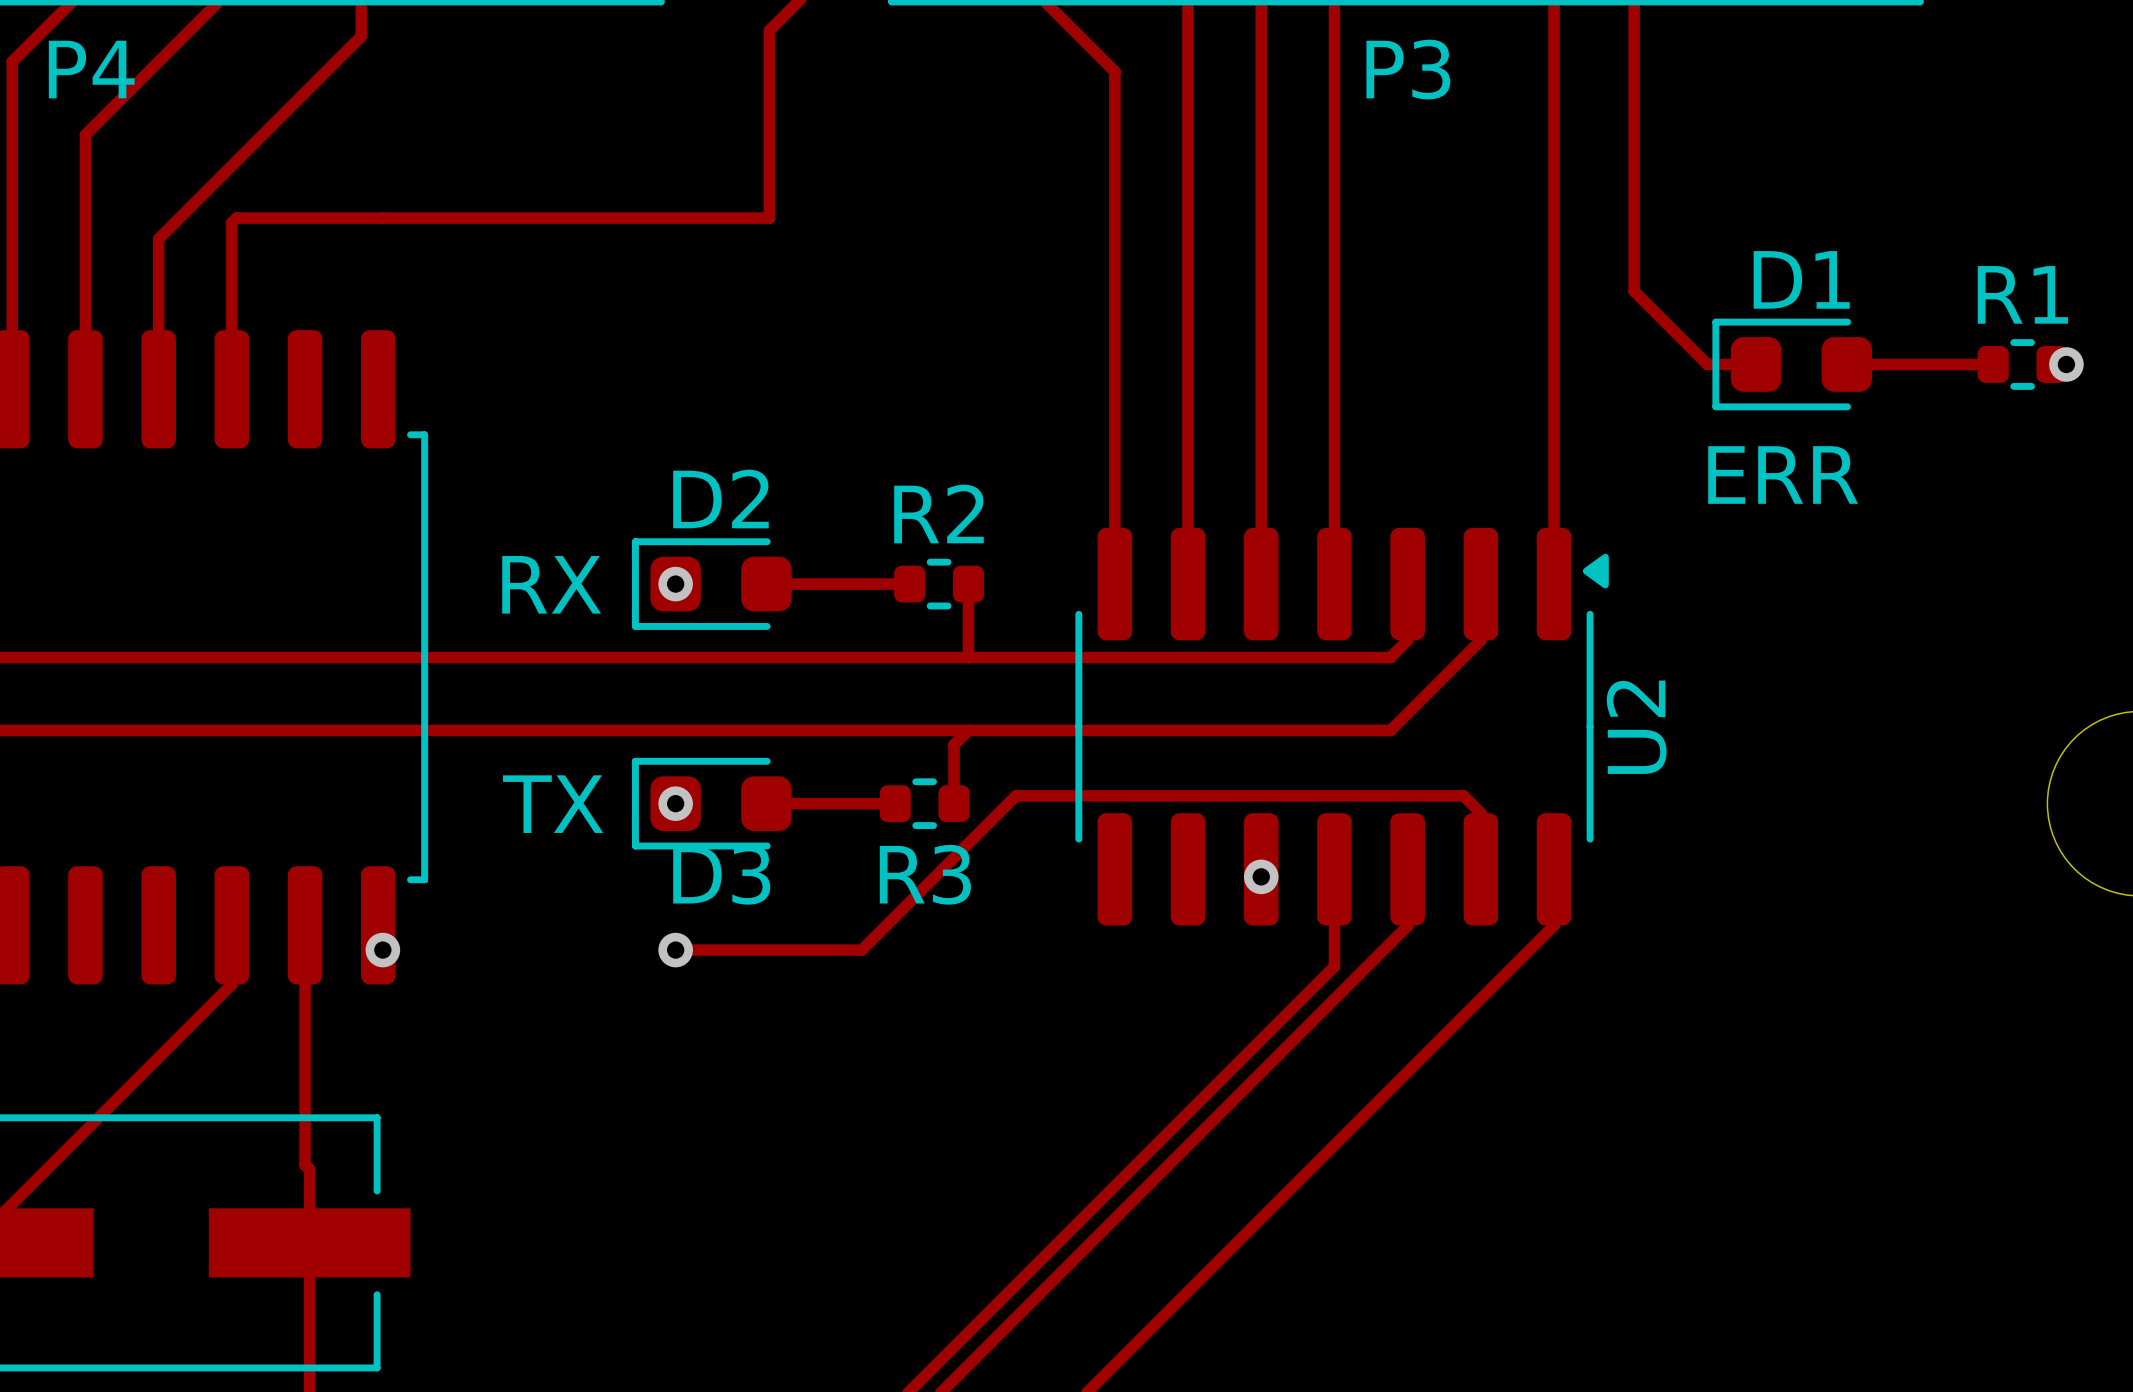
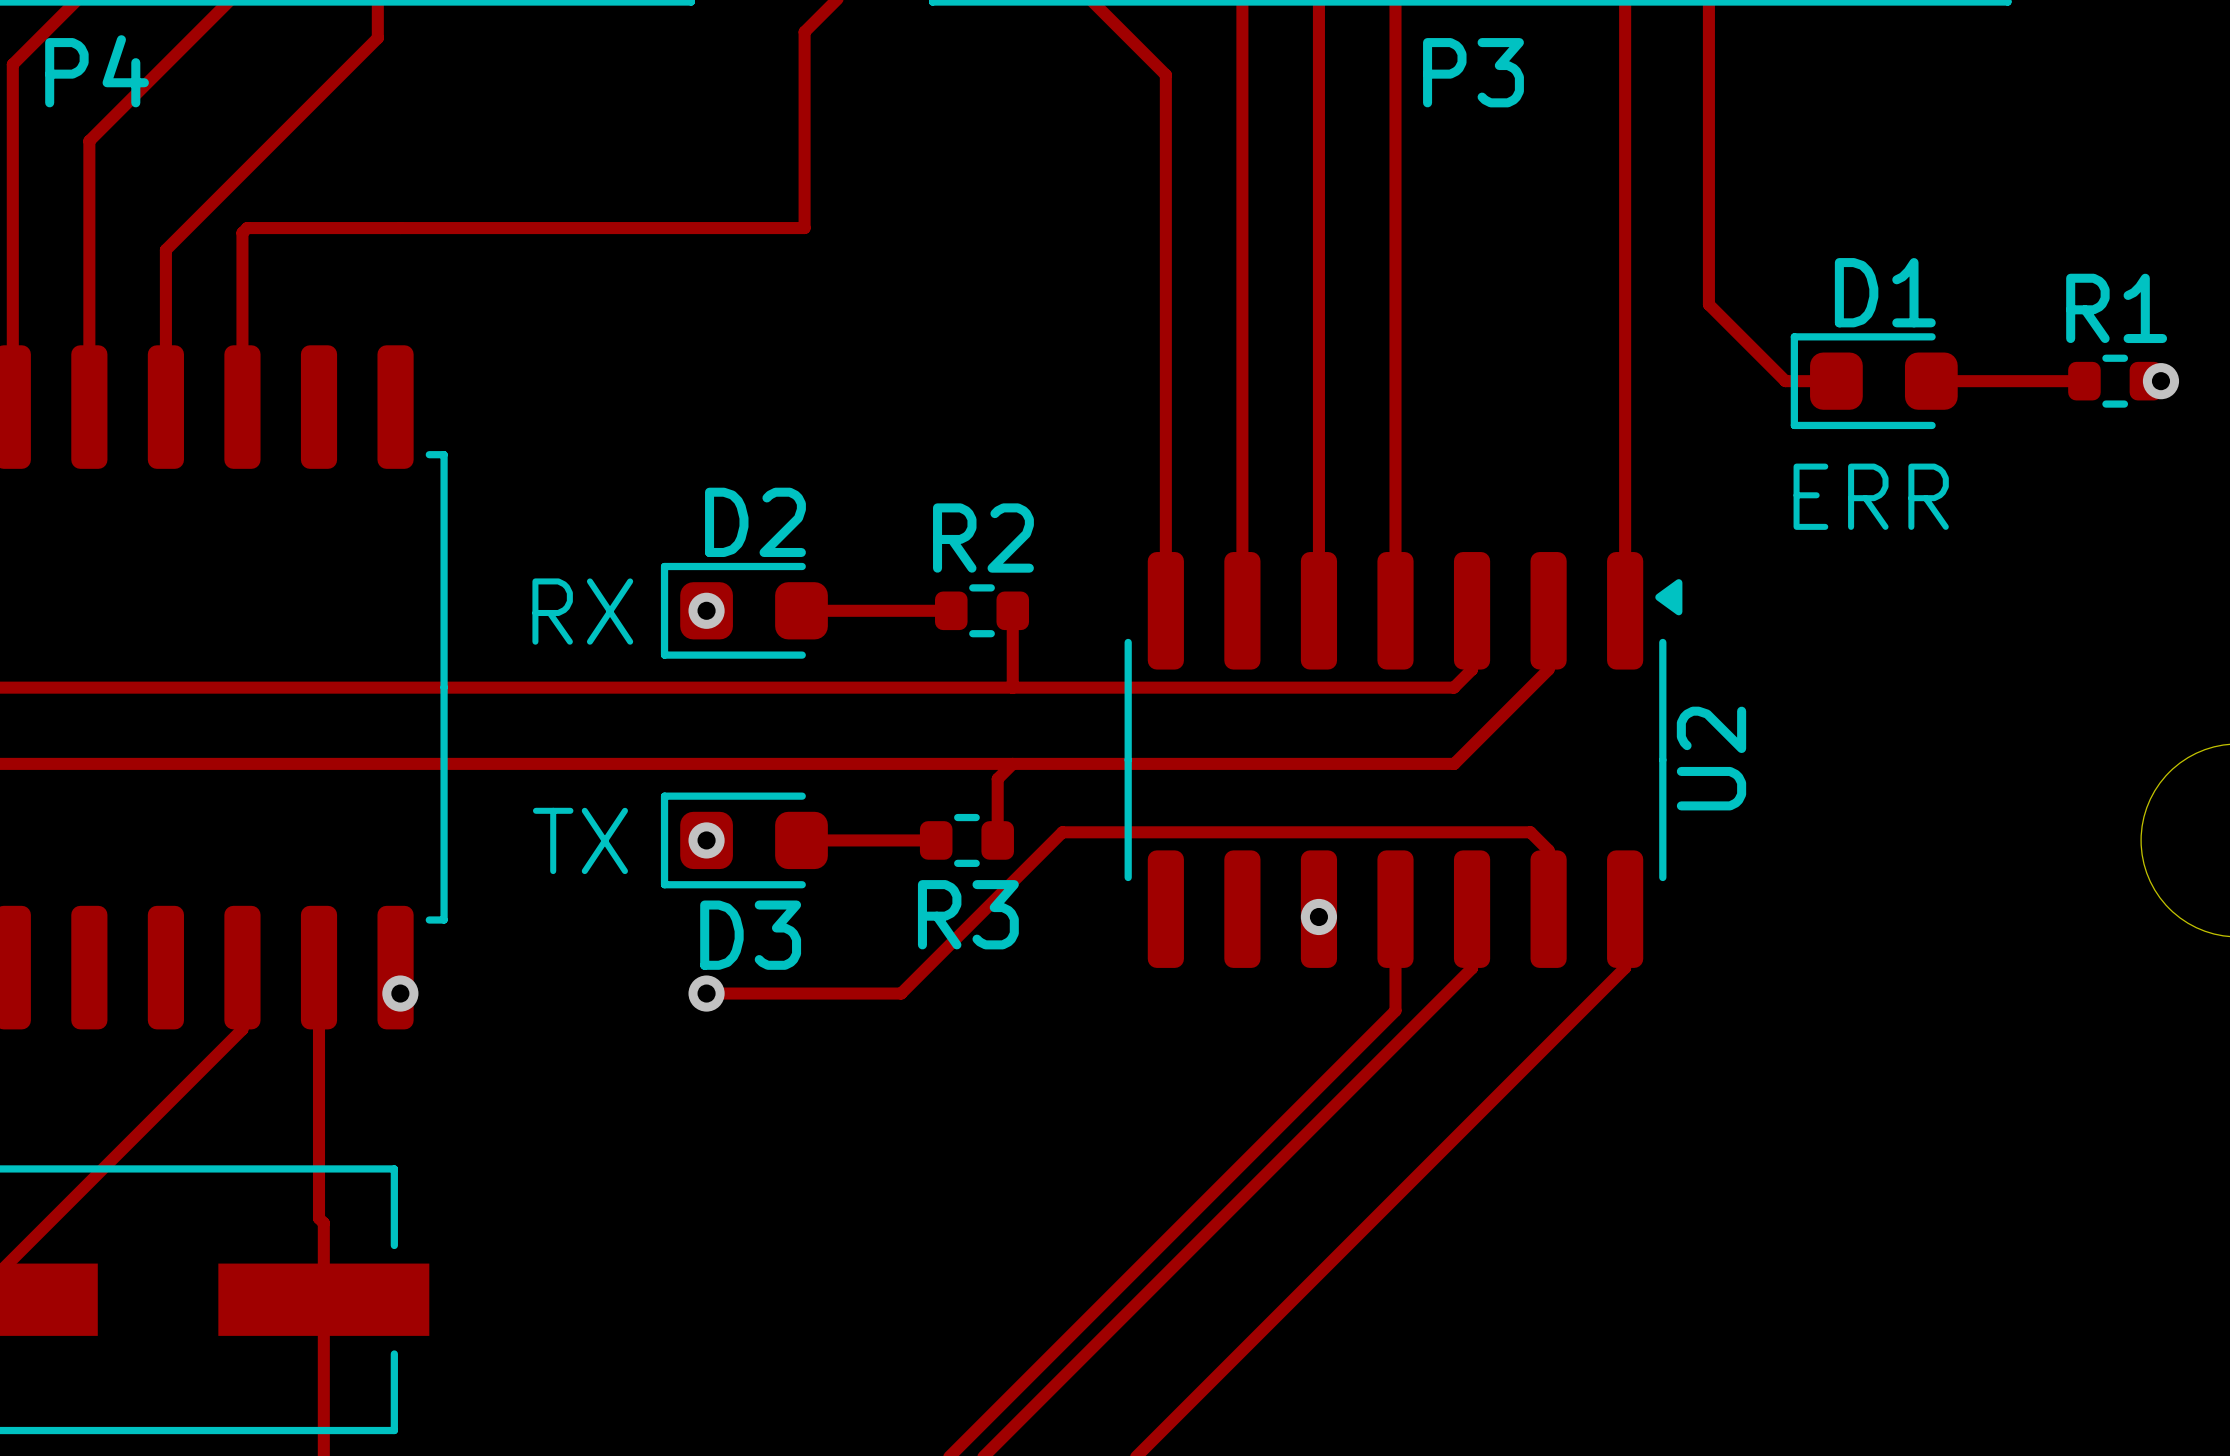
D3 name position: D3 (721, 874) -> D3 (750, 935)

